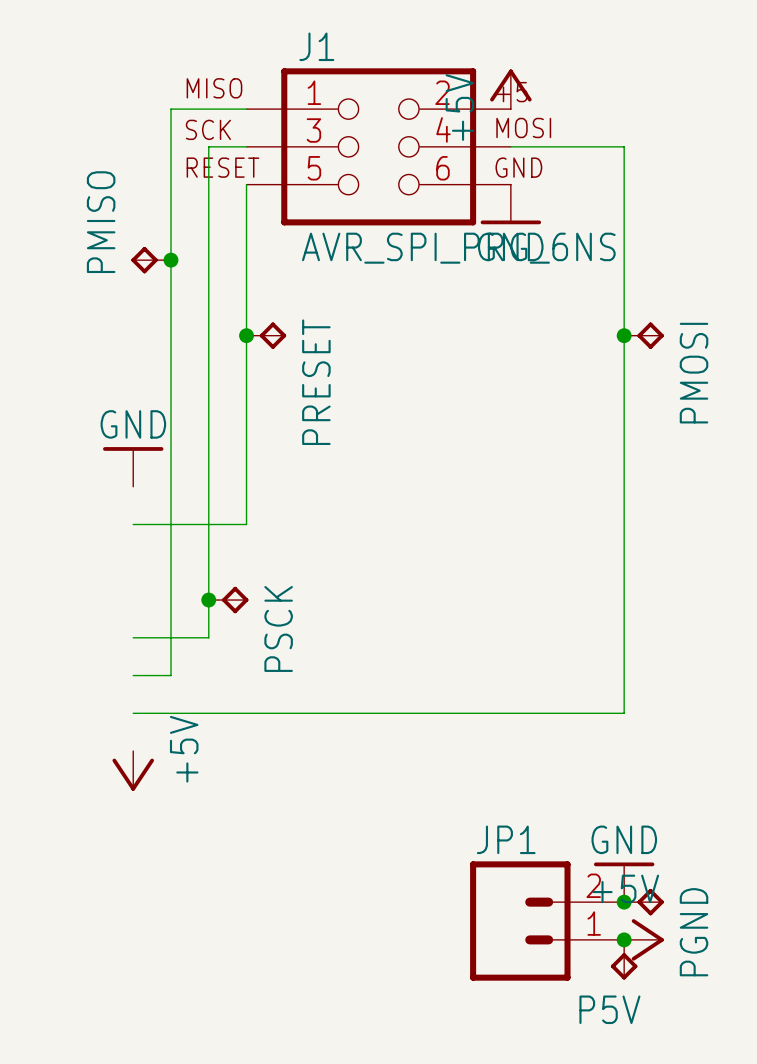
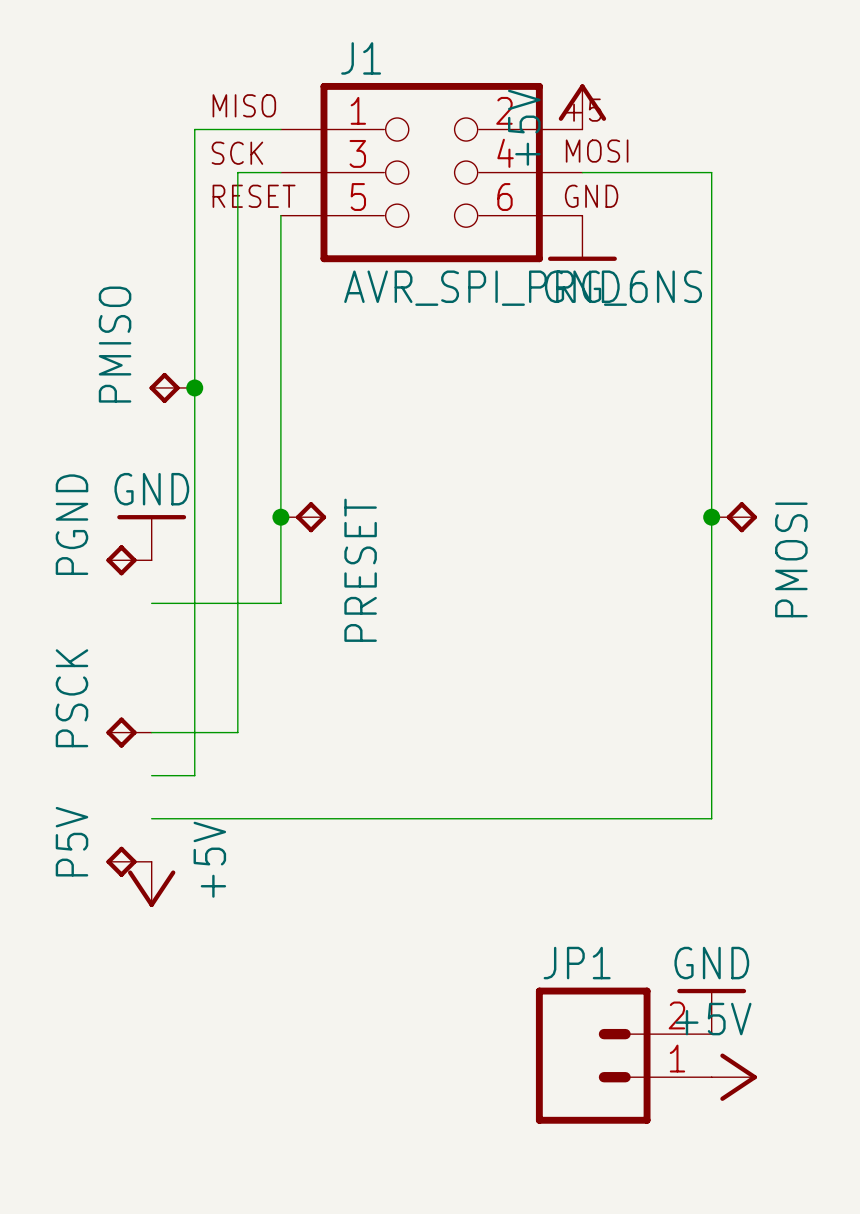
PMISO position: (151, 260) -> (172, 387)
junction: (170, 260) -> none
junction: none -> (194, 387)
junction: (246, 335) -> none
PRESET position: (266, 335) -> (303, 517)
junction: (624, 335) -> none
PMOSI position: (643, 335) -> (734, 517)
junction: none -> (280, 517)
junction: none -> (711, 517)
PGND: none -> (129, 560)
junction: (208, 600) -> none
PSCK position: (228, 600) -> (129, 732)
PSCK rotation: 0° (235, 600) -> 180° (121, 732)
junction: (624, 902) -> none
PGND: (643, 902) -> none
junction: (624, 939) -> none
P5V position: (624, 959) -> (129, 861)
P5V rotation: 0° (624, 966) -> 90° clockwise (121, 861)

